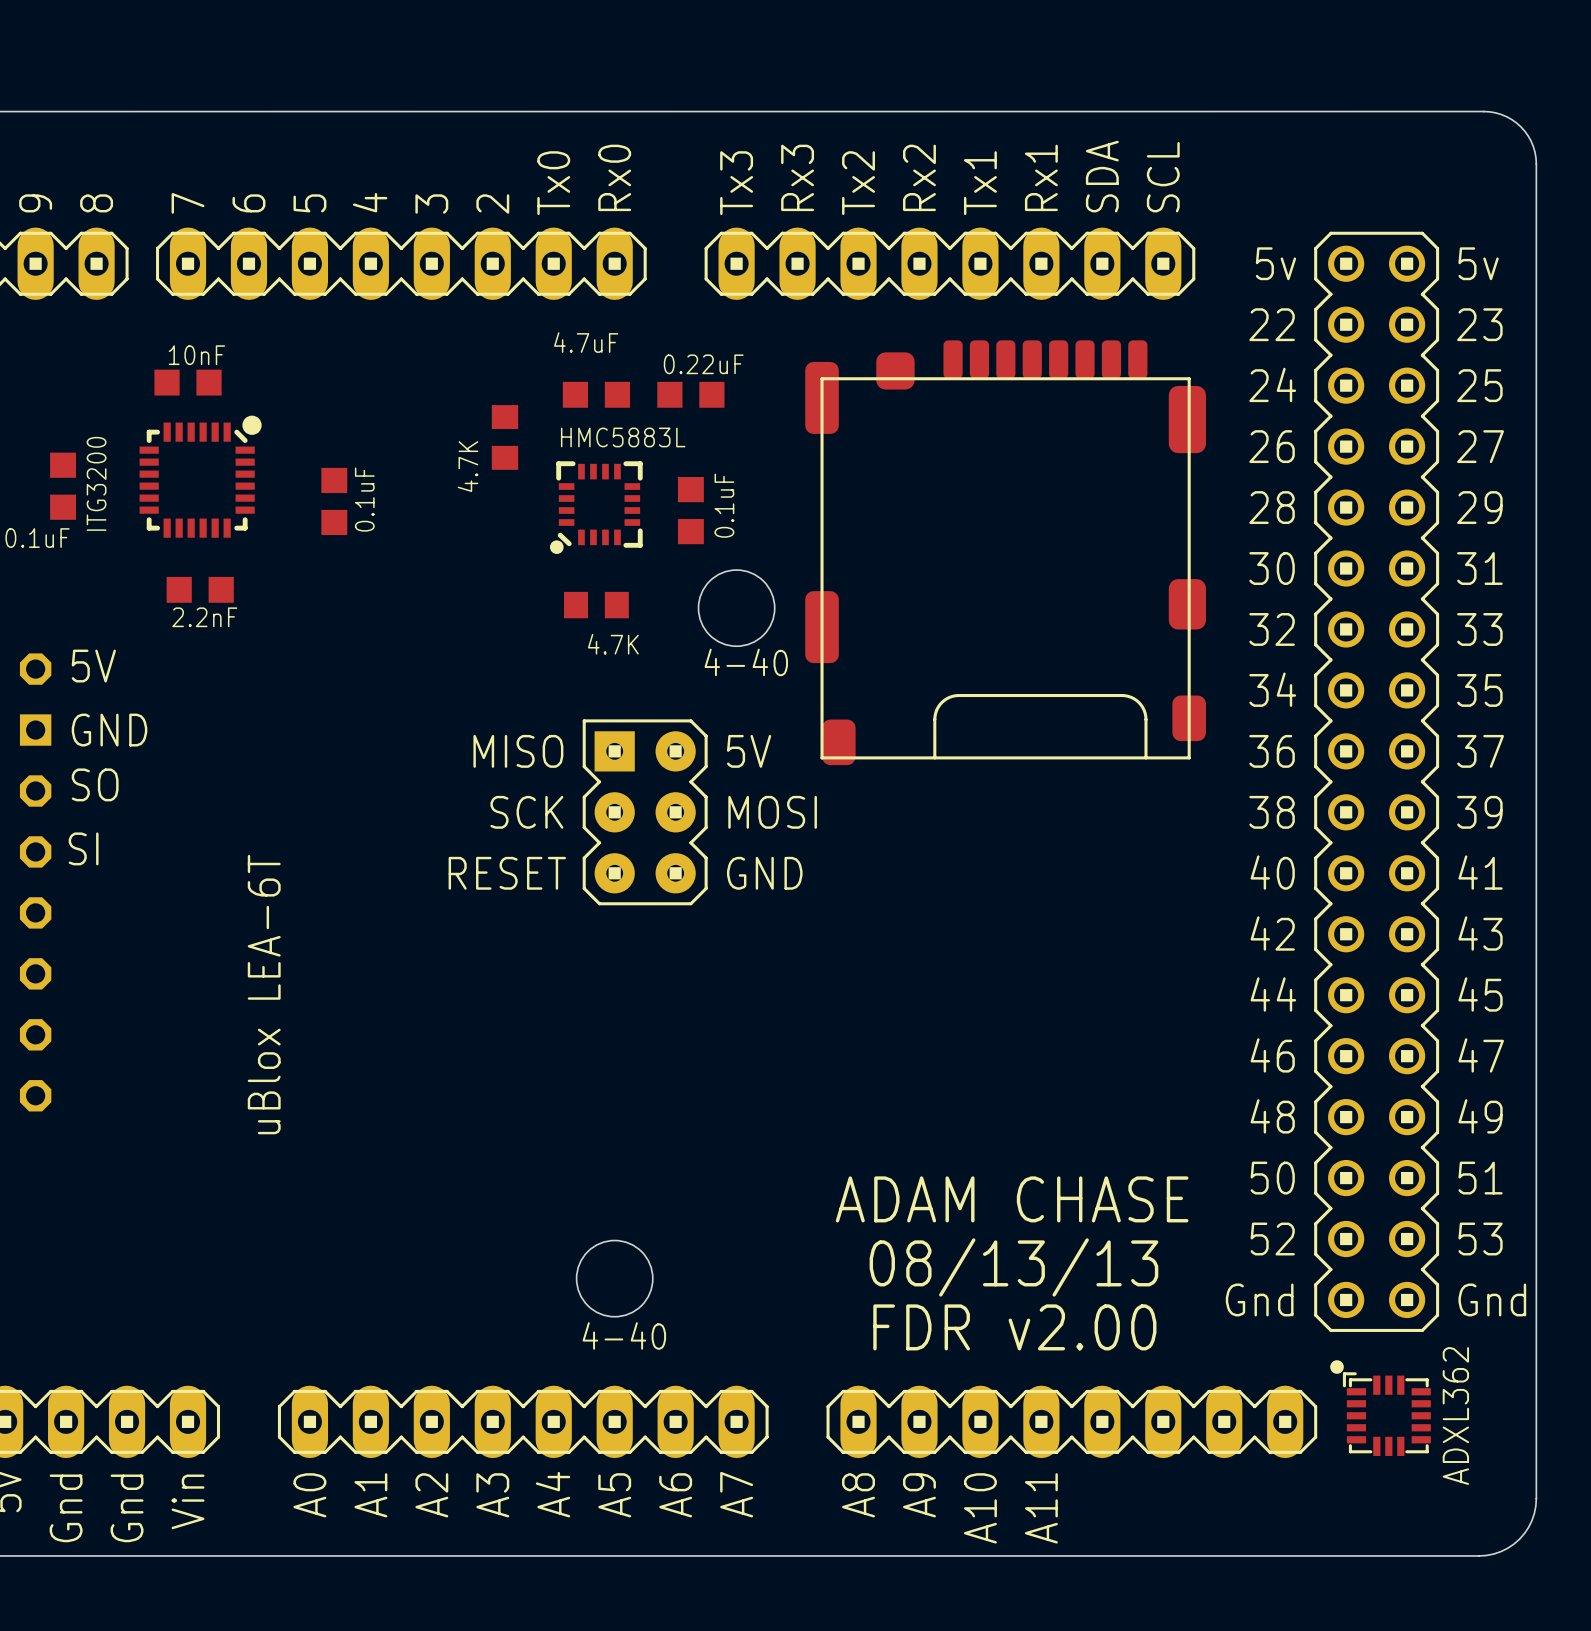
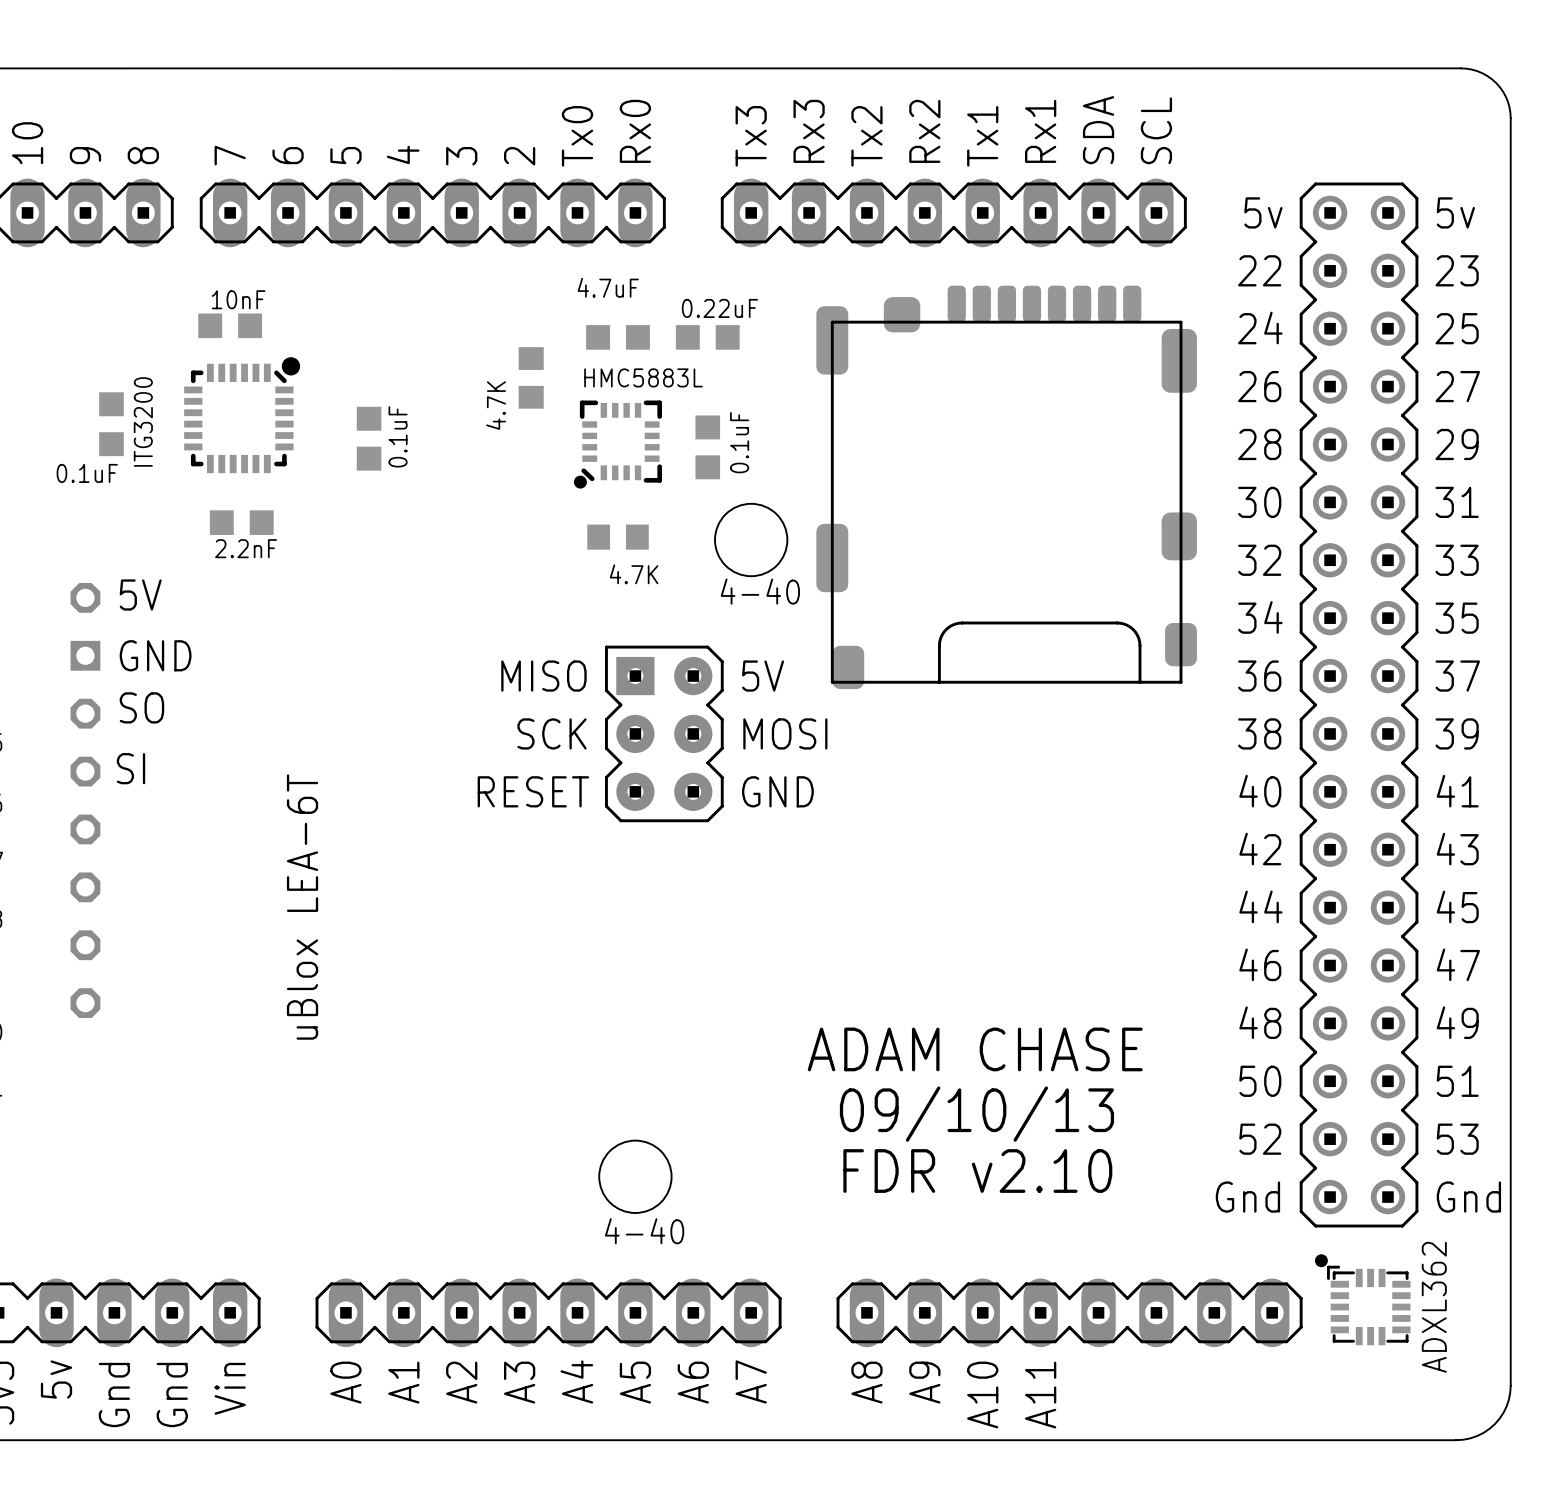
text position: ADAM CHASE (1012, 1199) -> ADAM CHASE (975, 1049)
text: none -> 09/10/13 (976, 1114)
text: 08/13/13 (1013, 1267) -> none
text: FDR v2.00 (1014, 1327) -> FDR v2.10 (977, 1171)

